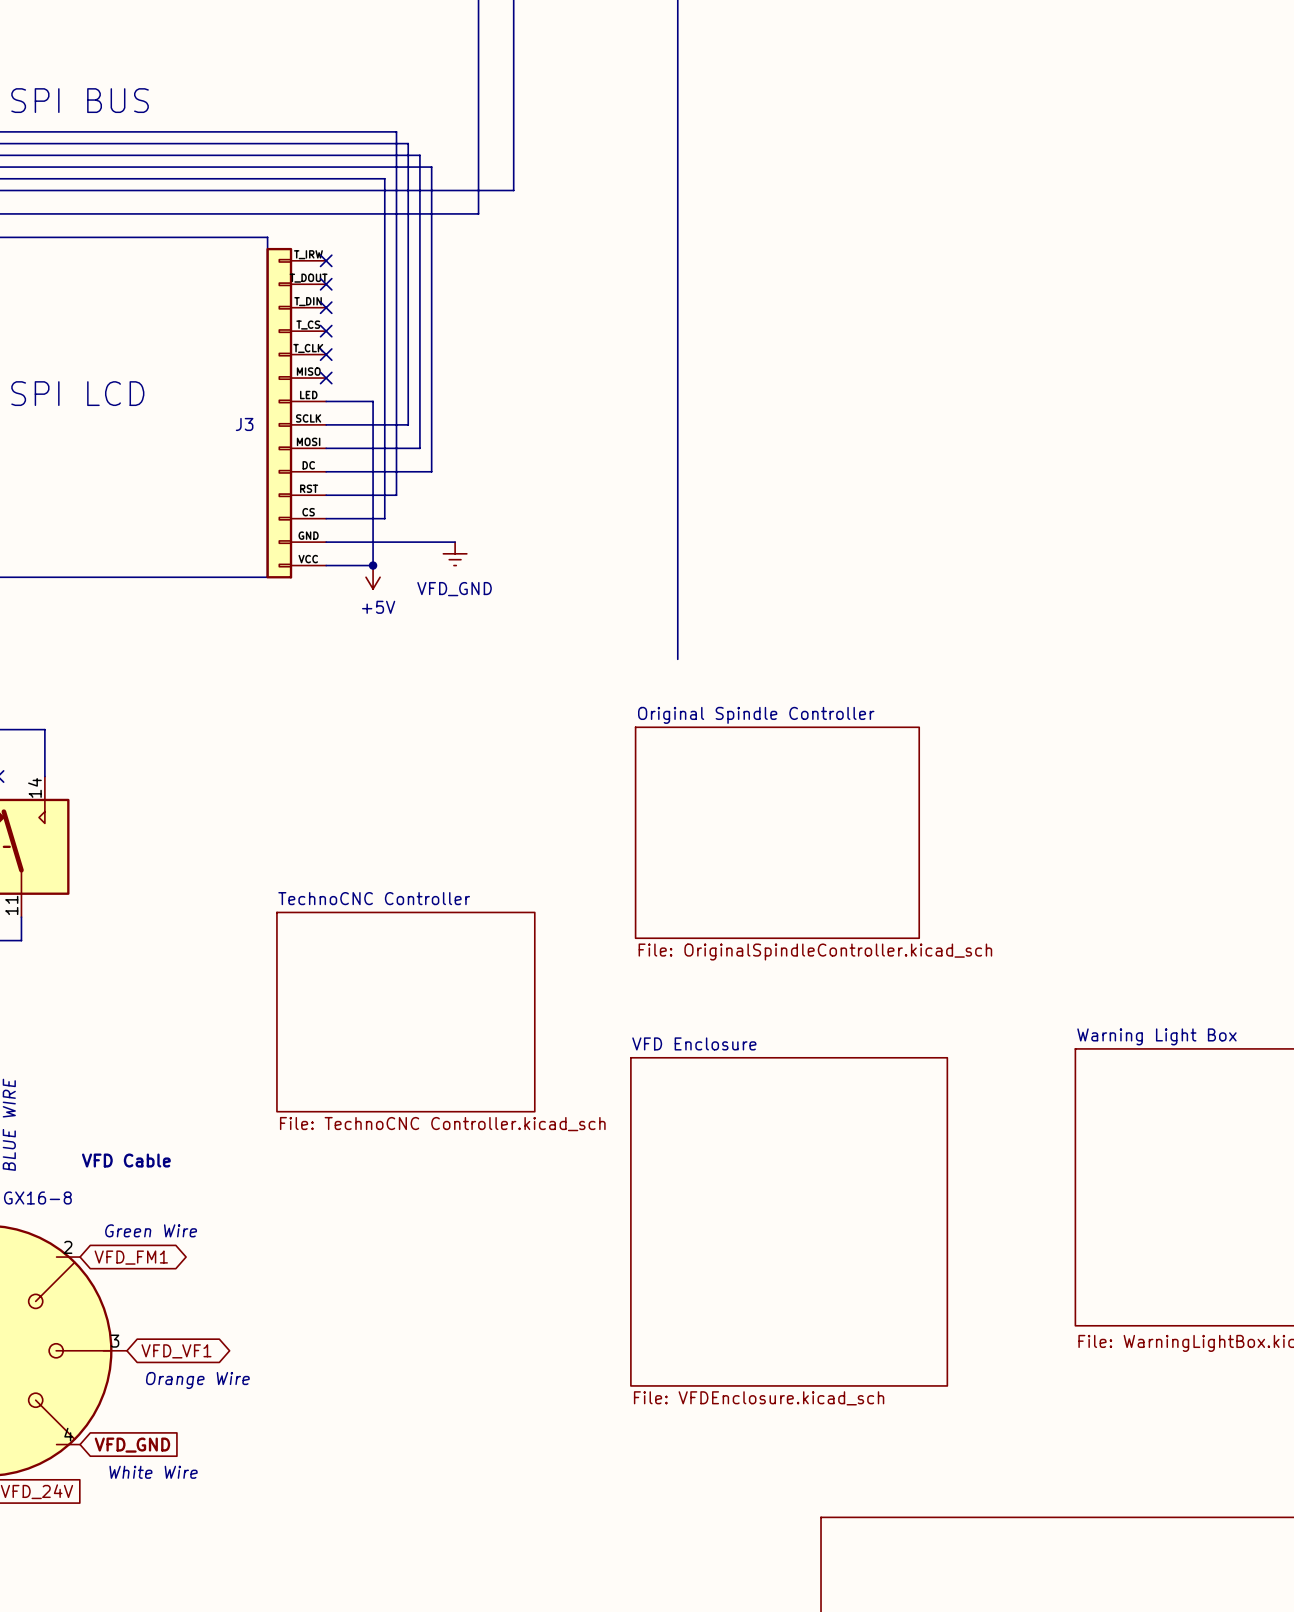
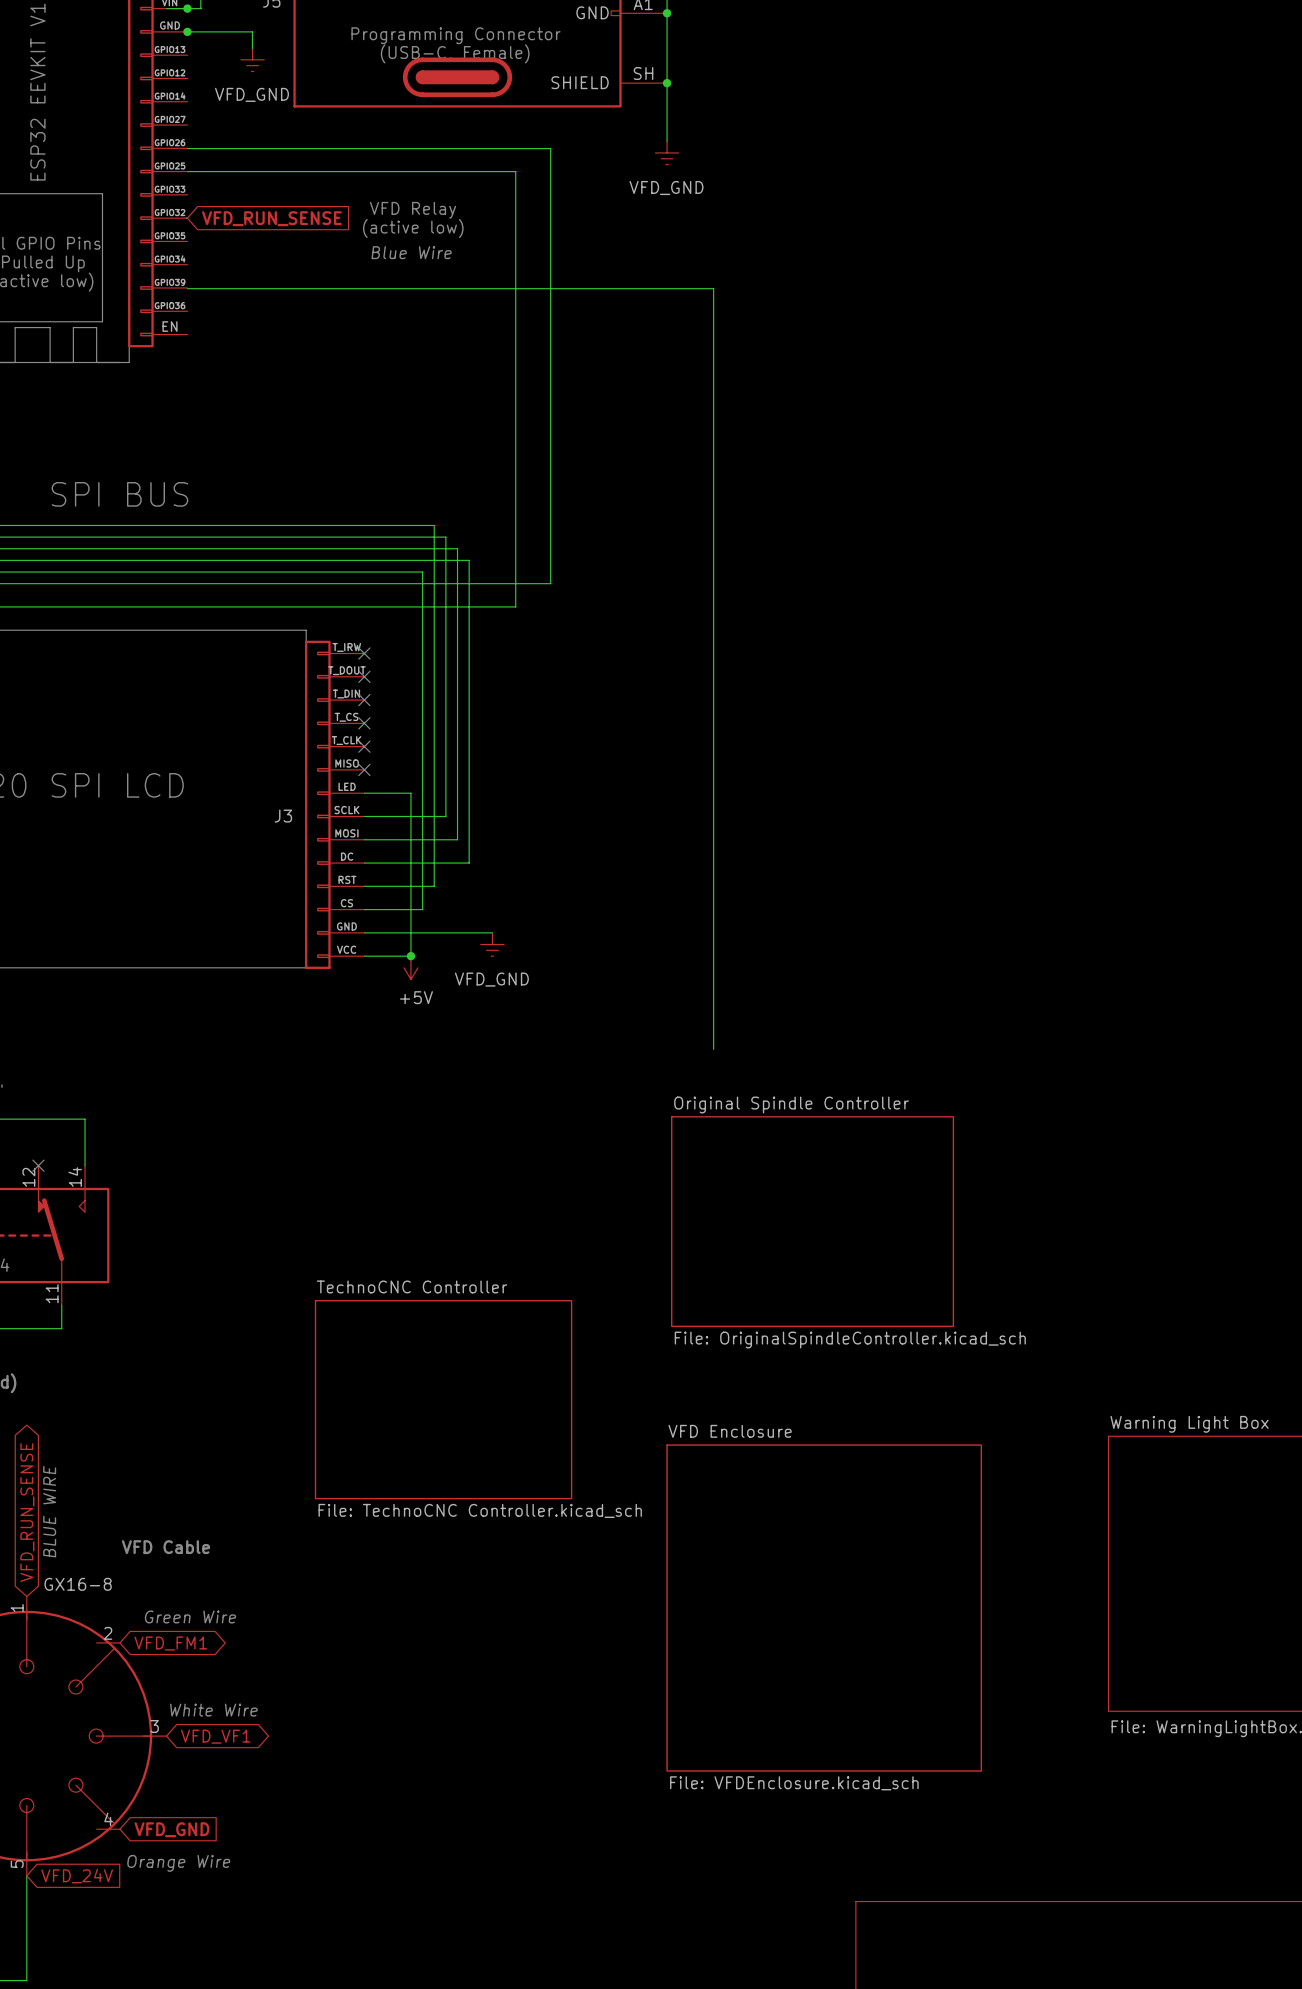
text position: Orange Wire (197, 1380) -> Orange Wire (178, 1863)
text position: White Wire (153, 1472) -> White Wire (213, 1710)

